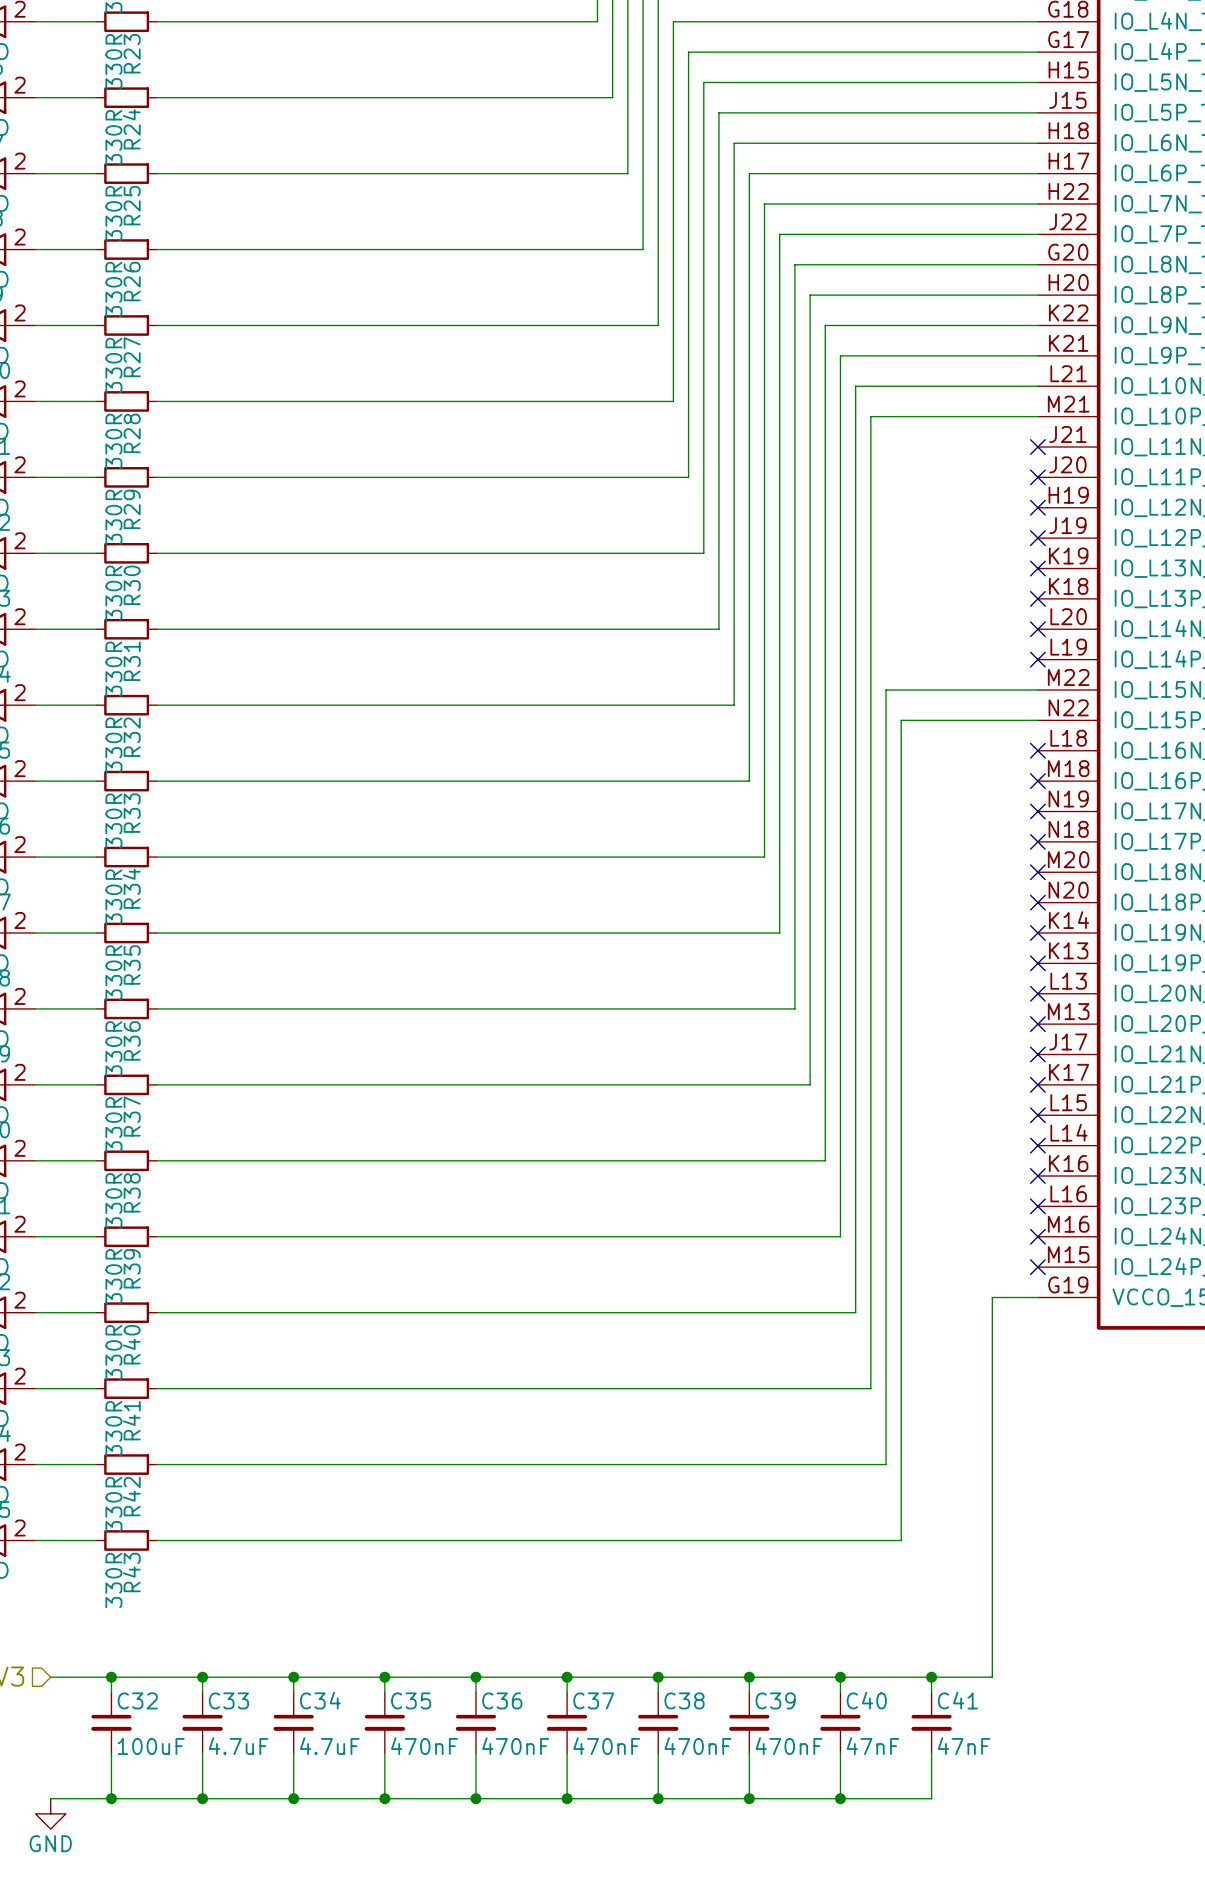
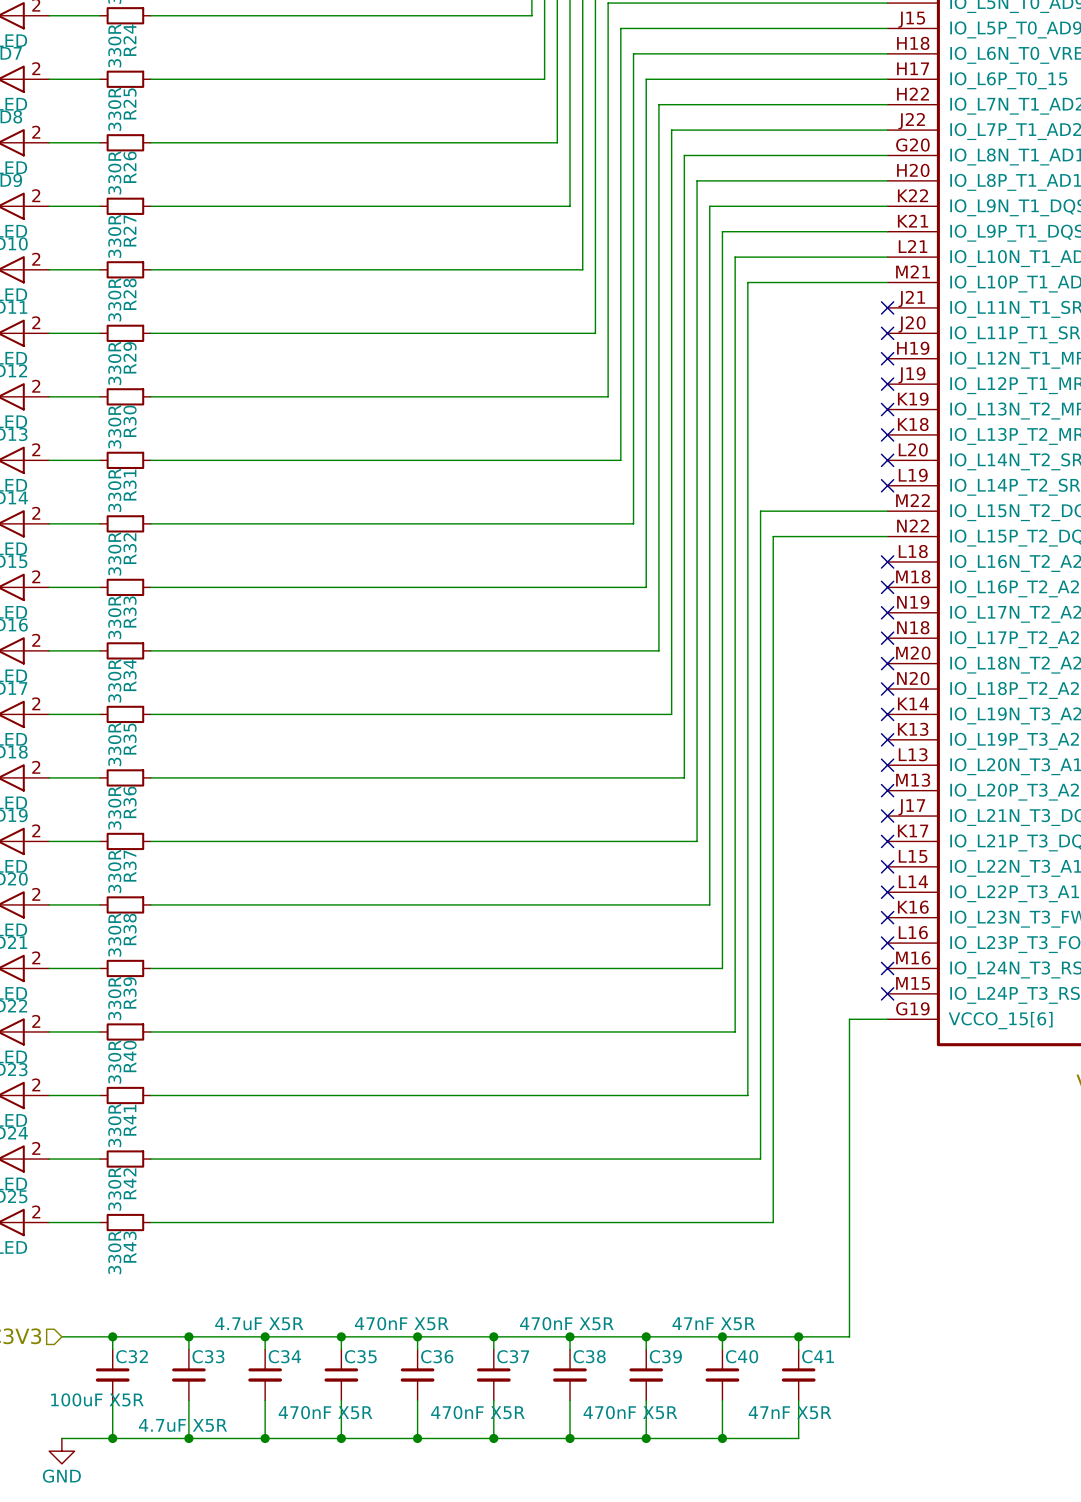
C32 value: 100uF (151, 1746) -> 100uF X5R (97, 1399)
C33 value: 4.7uF (238, 1746) -> 4.7uF X5R (183, 1425)
C34 value: 4.7uF (329, 1746) -> 4.7uF X5R (259, 1323)
C35 value: 470nF (424, 1746) -> 470nF X5R (325, 1412)
C36 value: 470nF (515, 1746) -> 470nF X5R (401, 1323)
C37 value: 470nF (606, 1746) -> 470nF X5R (477, 1412)
C38 value: 470nF (697, 1746) -> 470nF X5R (566, 1323)
C39 value: 470nF (789, 1746) -> 470nF X5R (630, 1412)
C40 value: 47nF (872, 1746) -> 47nF X5R (713, 1323)
C41 value: 47nF (964, 1746) -> 47nF X5R (789, 1412)

